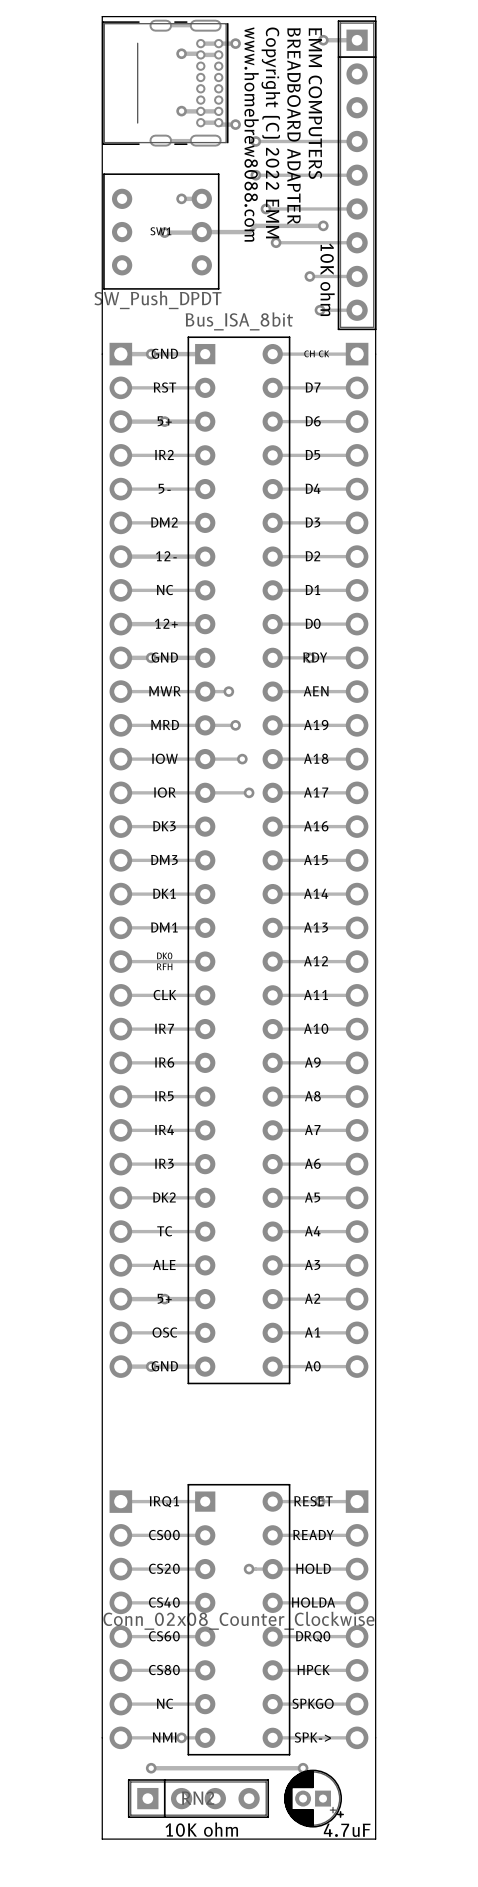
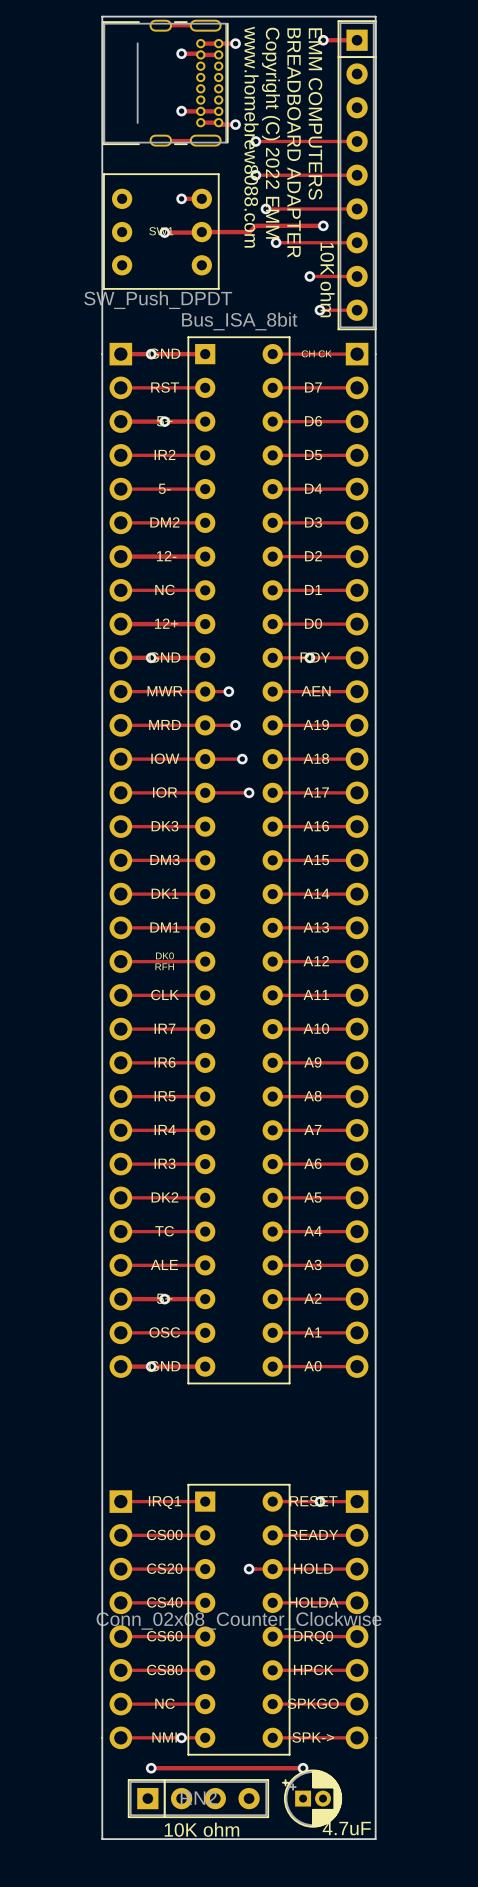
part rotation: 0° (314, 1798) -> 180° (312, 1798)

